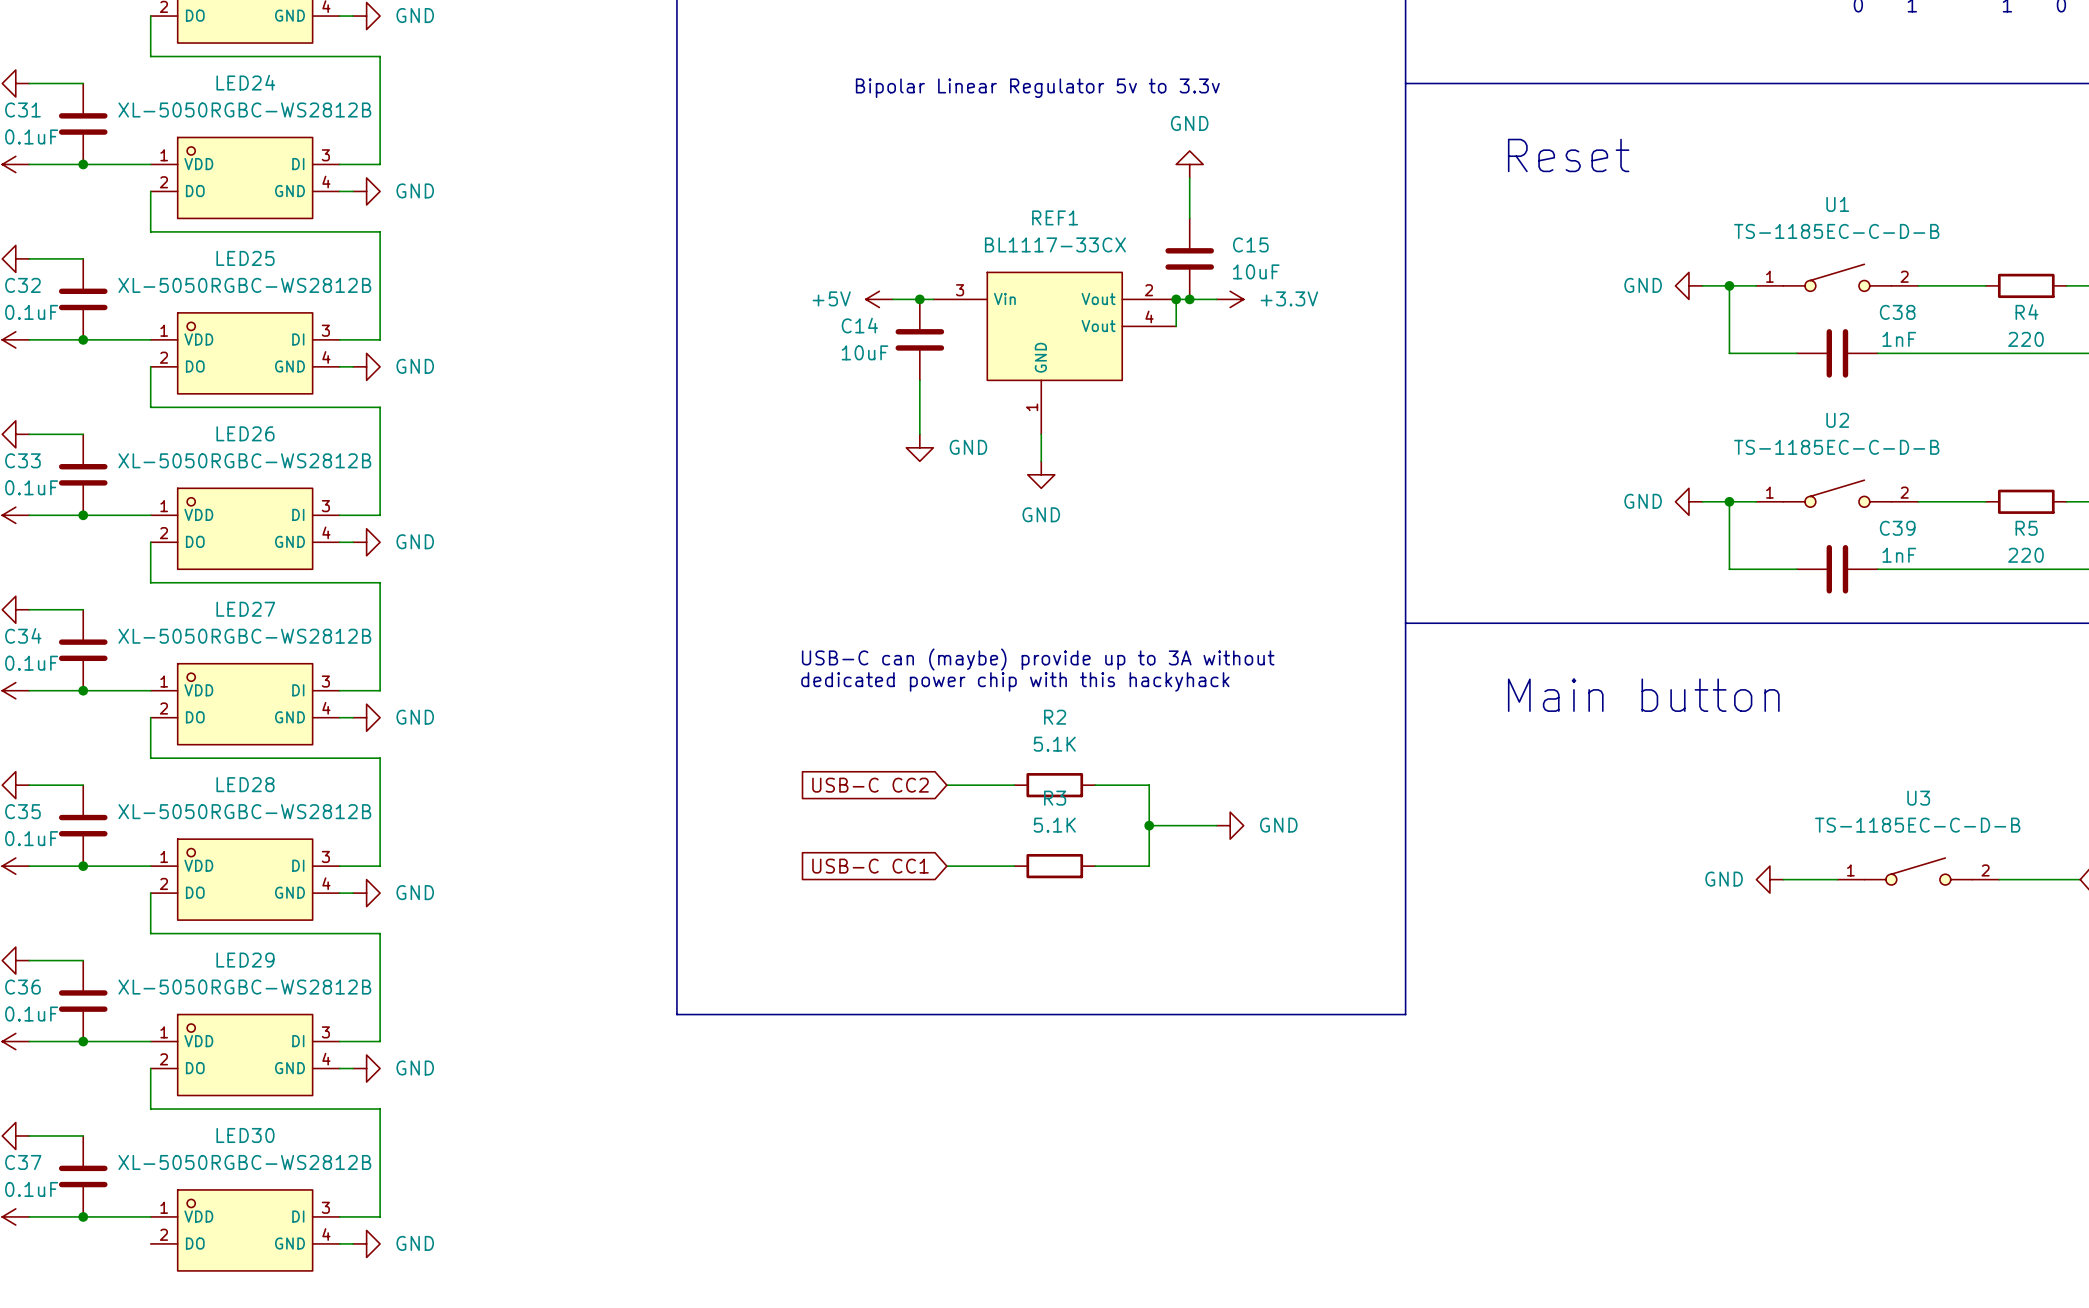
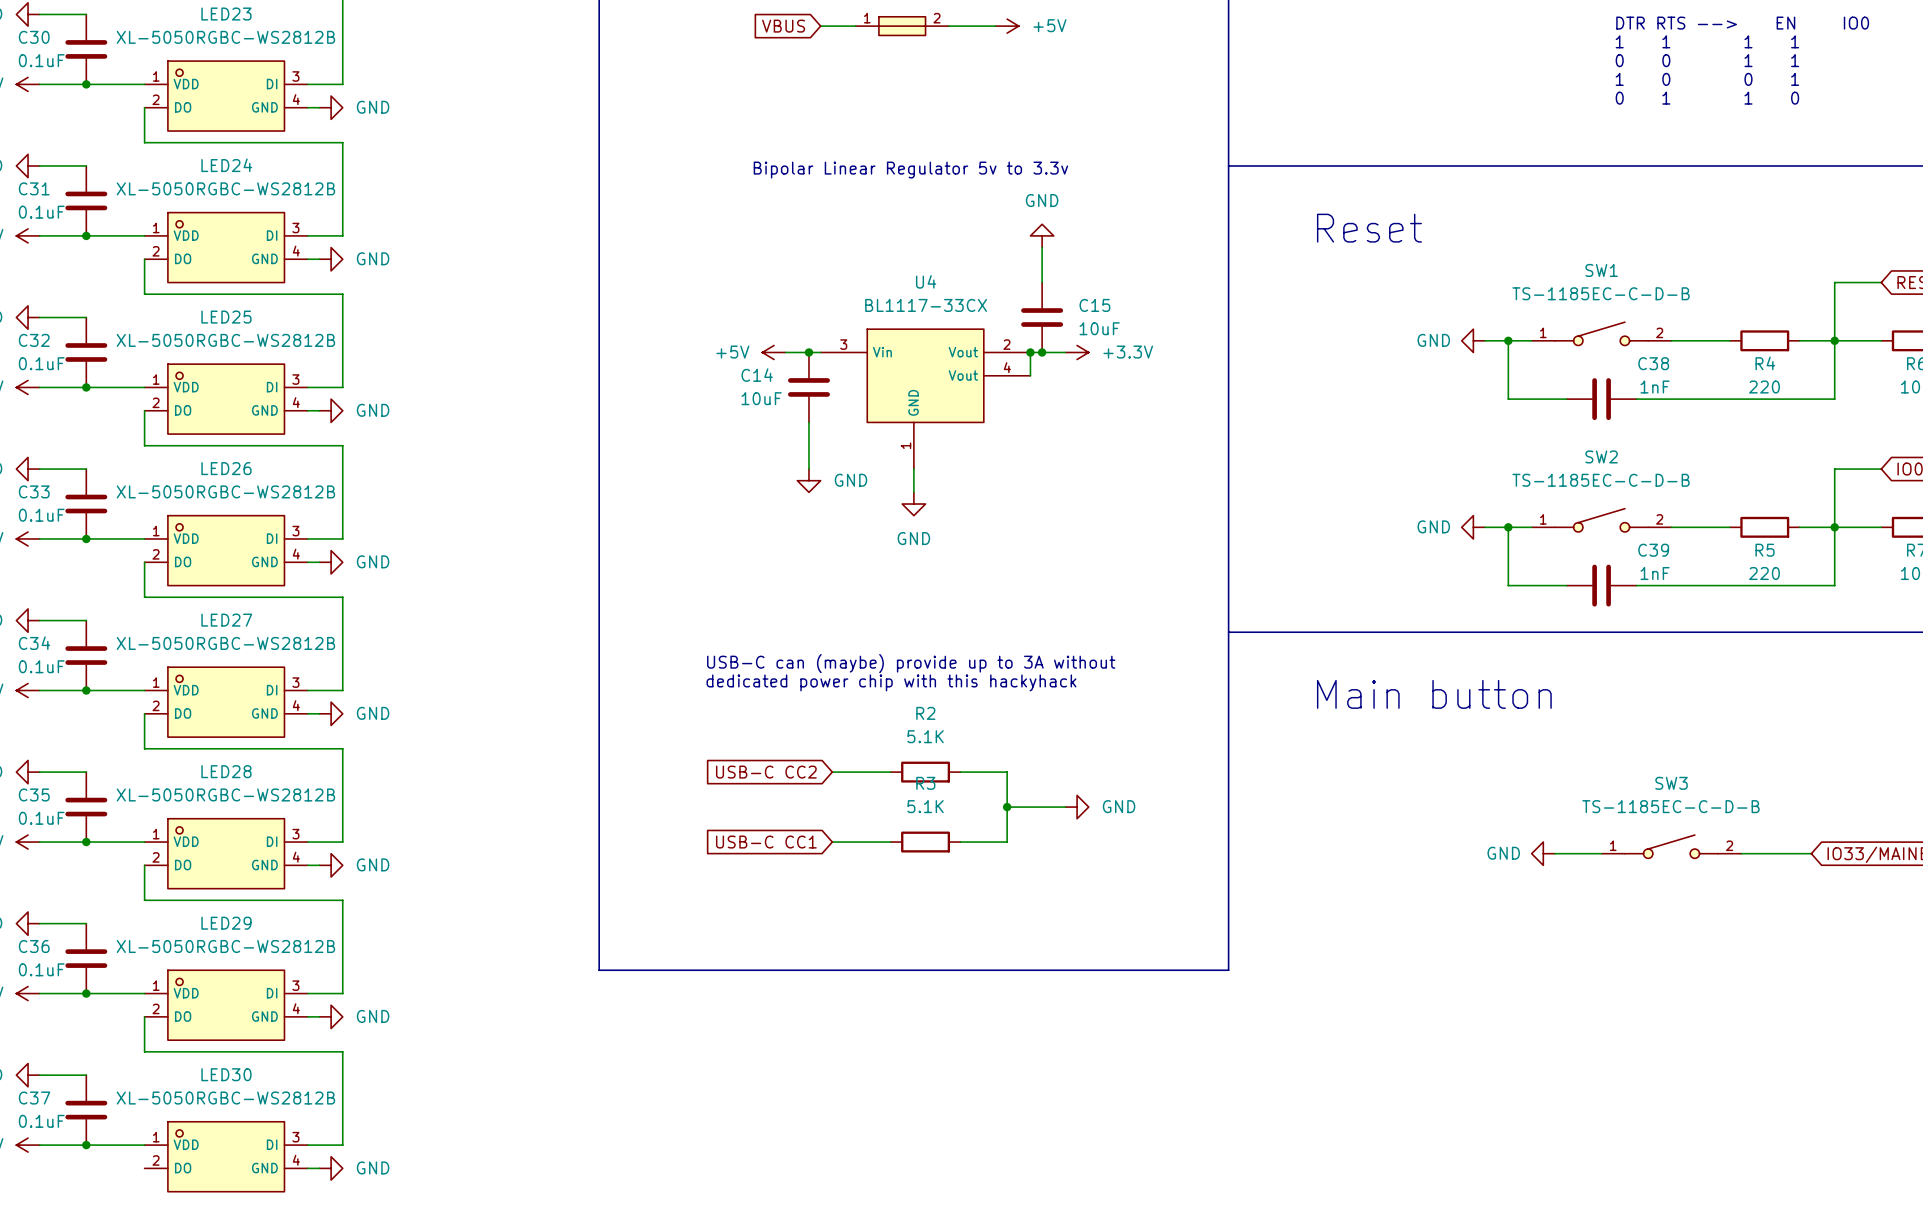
U1 name: U1 (1837, 204) -> SW1 (1601, 270)
REF1 name: REF1 (1055, 217) -> U4 (926, 281)
U2 name: U2 (1837, 420) -> SW2 (1601, 456)
U3 name: U3 (1918, 798) -> SW3 (1671, 783)

